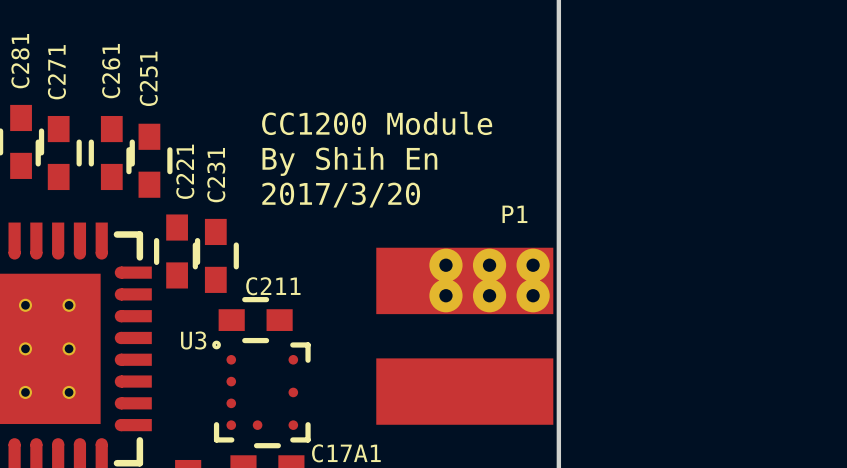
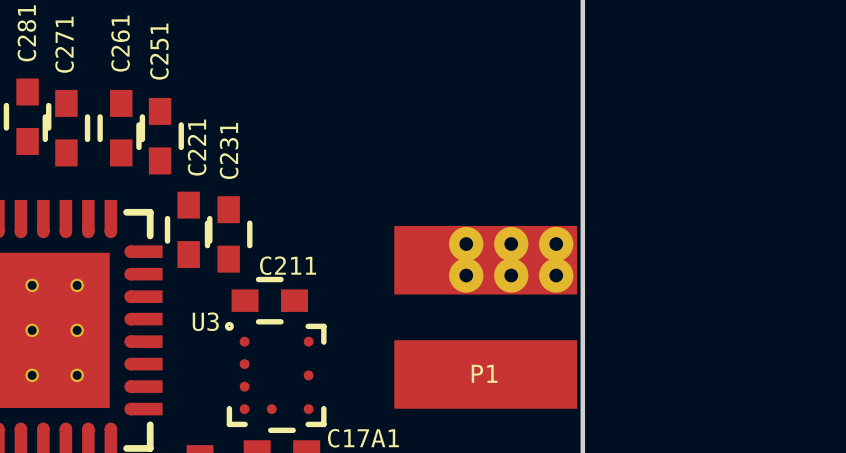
text: CC1200 Module (377, 123) -> none
text: By Shih En (349, 161) -> none
text: 2017/3/20 (341, 195) -> none
P1 name position: P1 (514, 214) -> P1 (484, 373)

